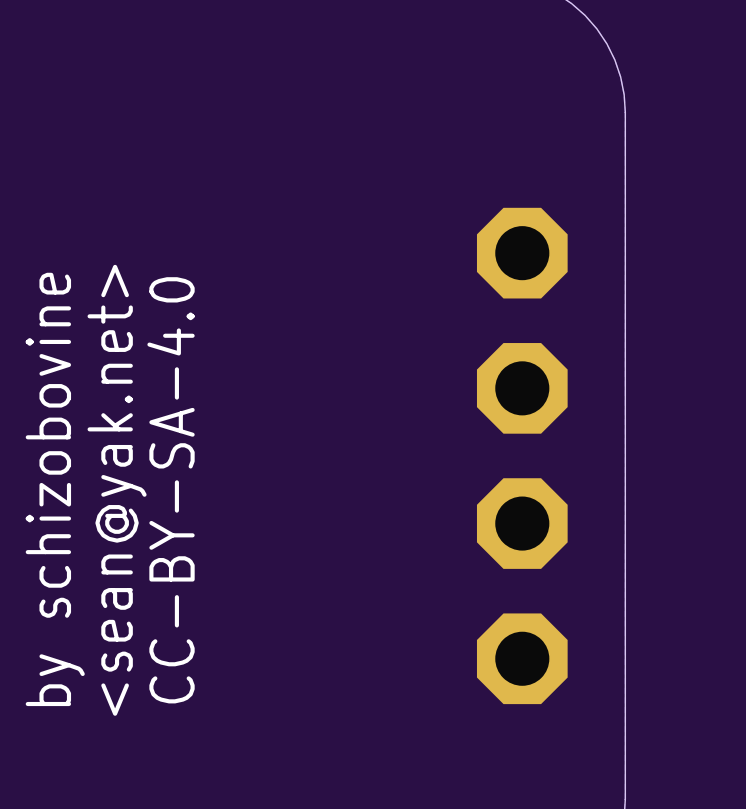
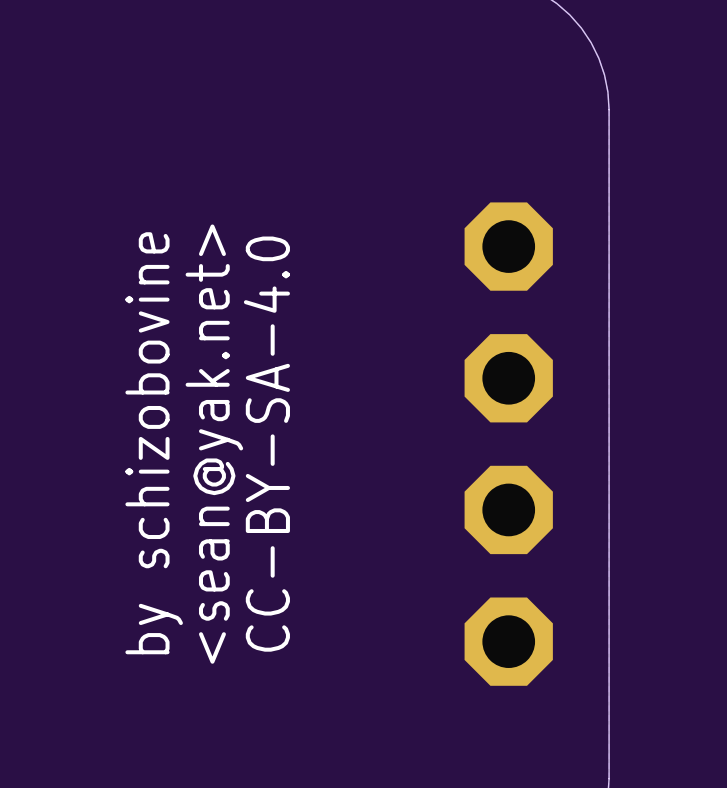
text position: by schizobovine (55, 489) -> by schizobovine (154, 443)
text position: <sean@yak.net> (117, 490) -> <sean@yak.net> (214, 444)
text position: CC-BY-SA-4.0 (171, 490) -> CC-BY-SA-4.0 (266, 444)

